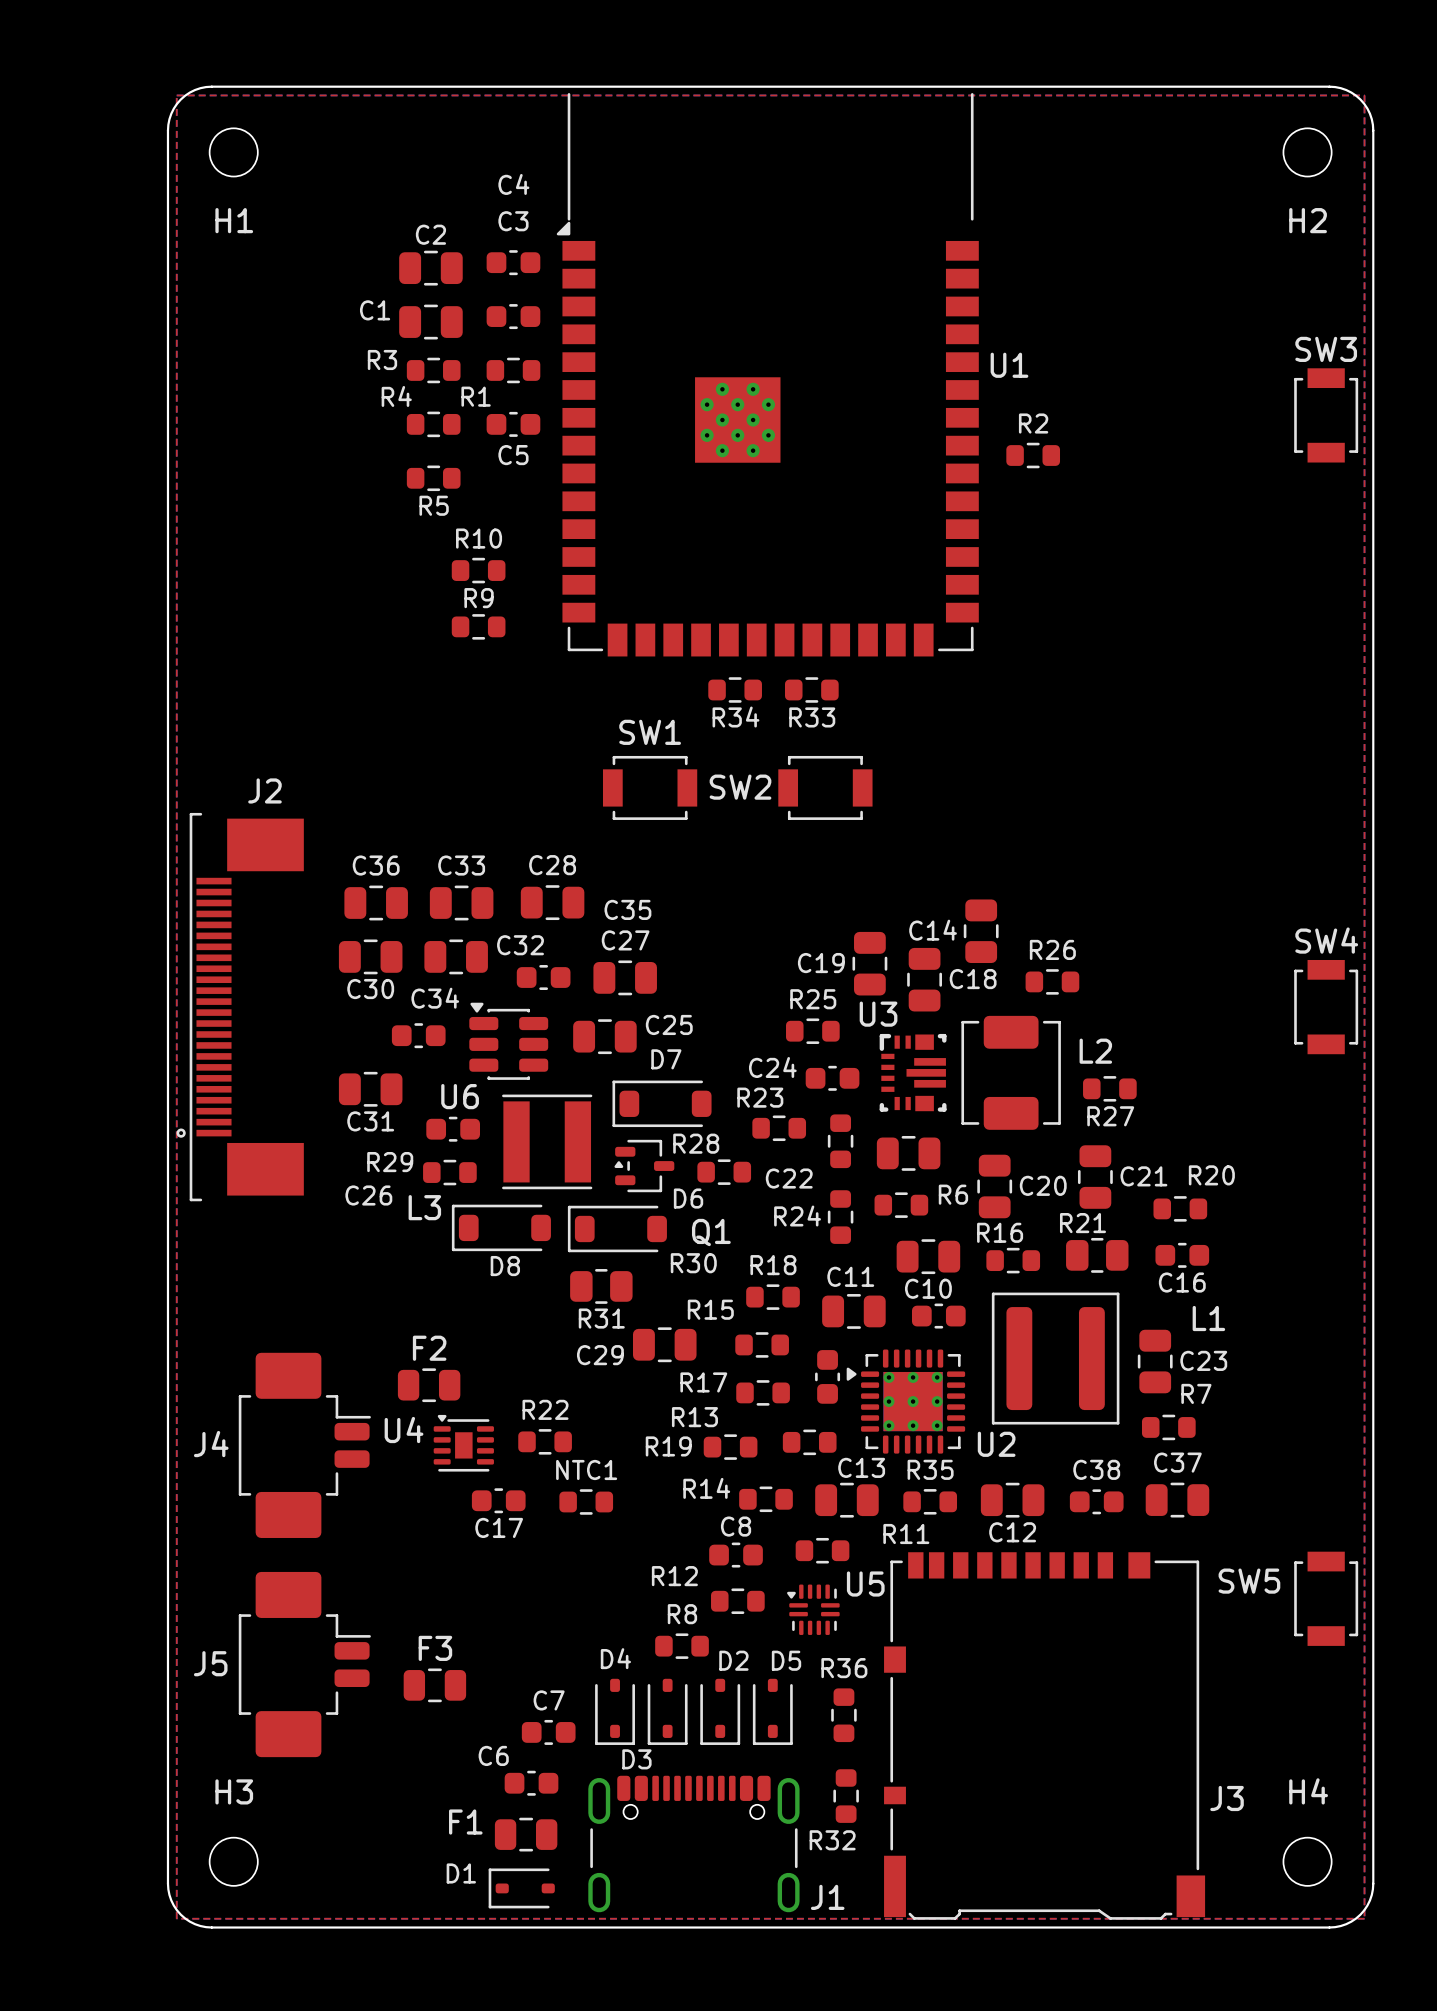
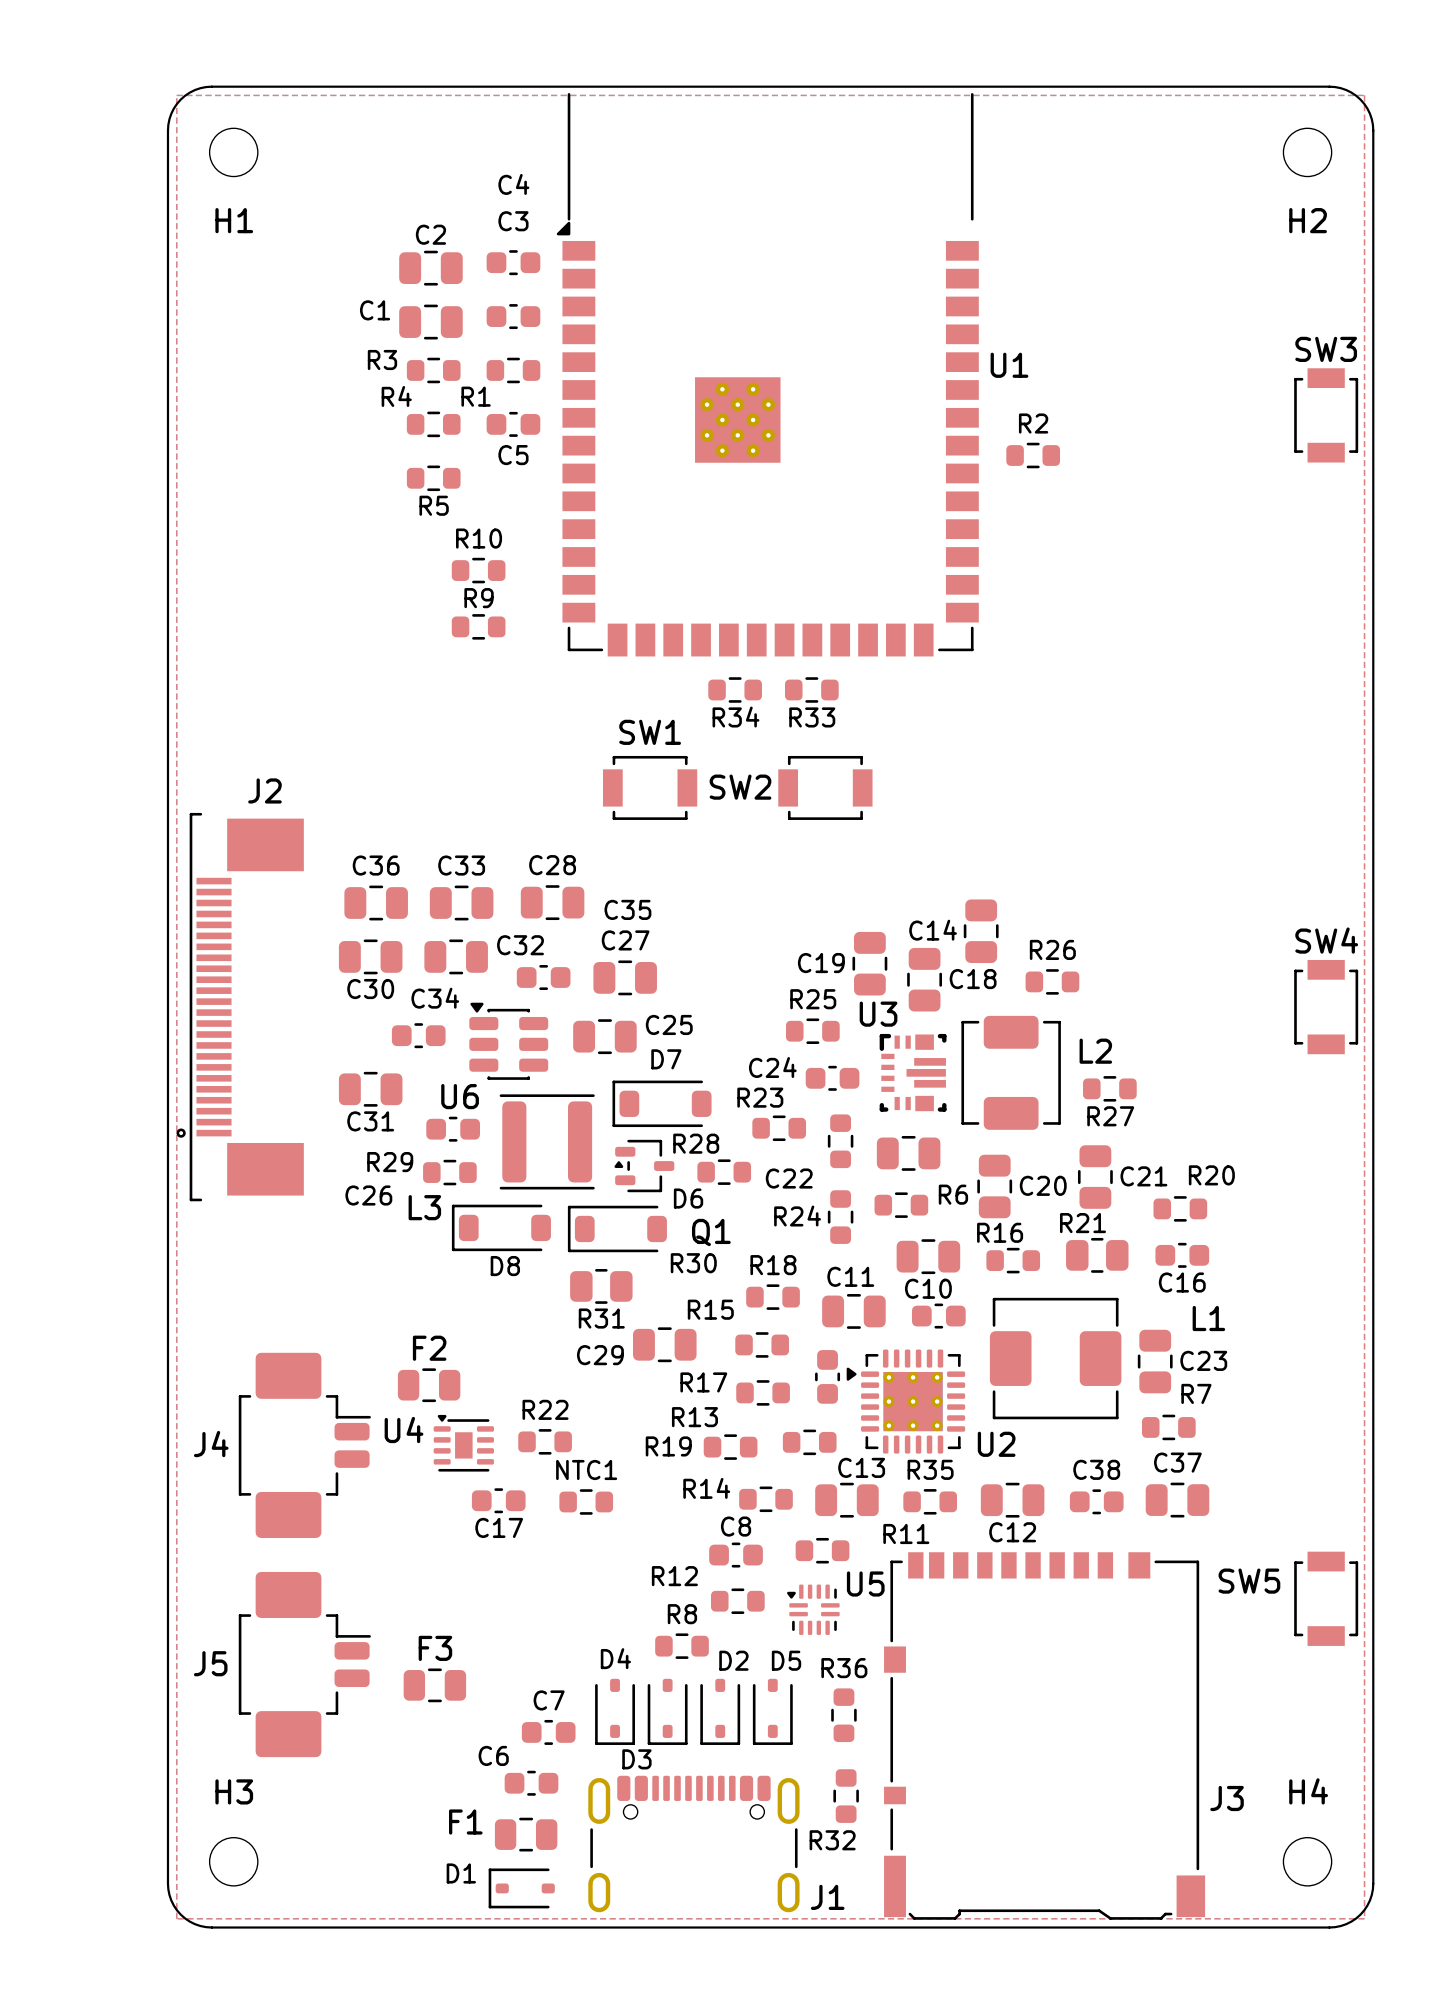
L3 footprint: [502, 1094, 593, 1190] -> [499, 1094, 595, 1190]
L1 footprint: [991, 1292, 1120, 1425] -> [989, 1297, 1122, 1420]

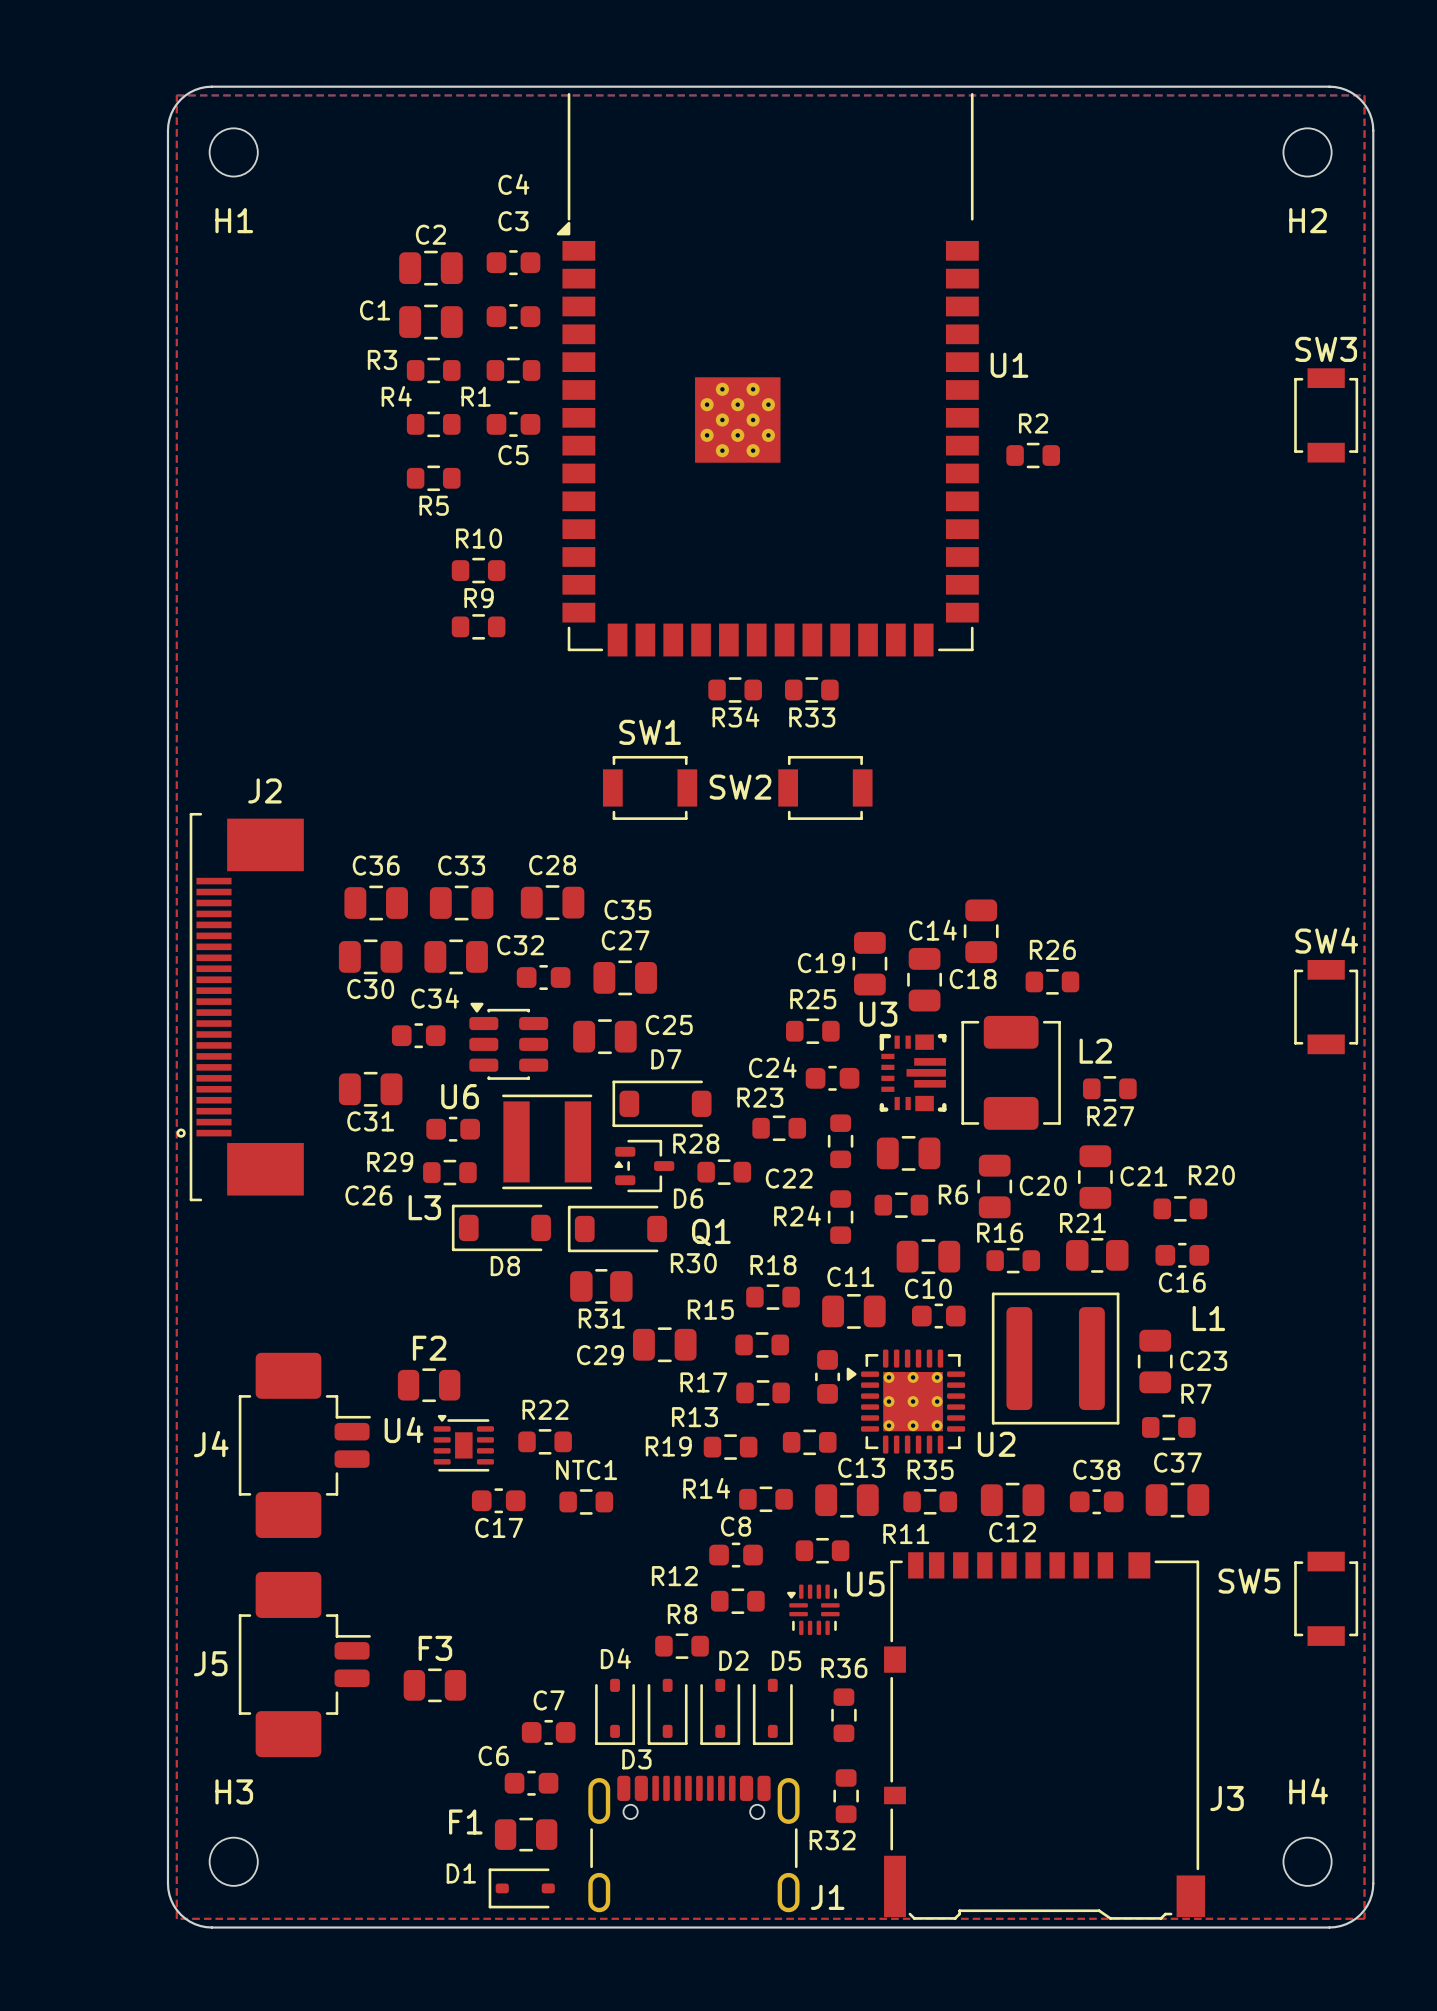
L3 footprint: [499, 1094, 595, 1190] -> [502, 1094, 593, 1190]
L1 footprint: [989, 1297, 1122, 1420] -> [991, 1292, 1120, 1425]

